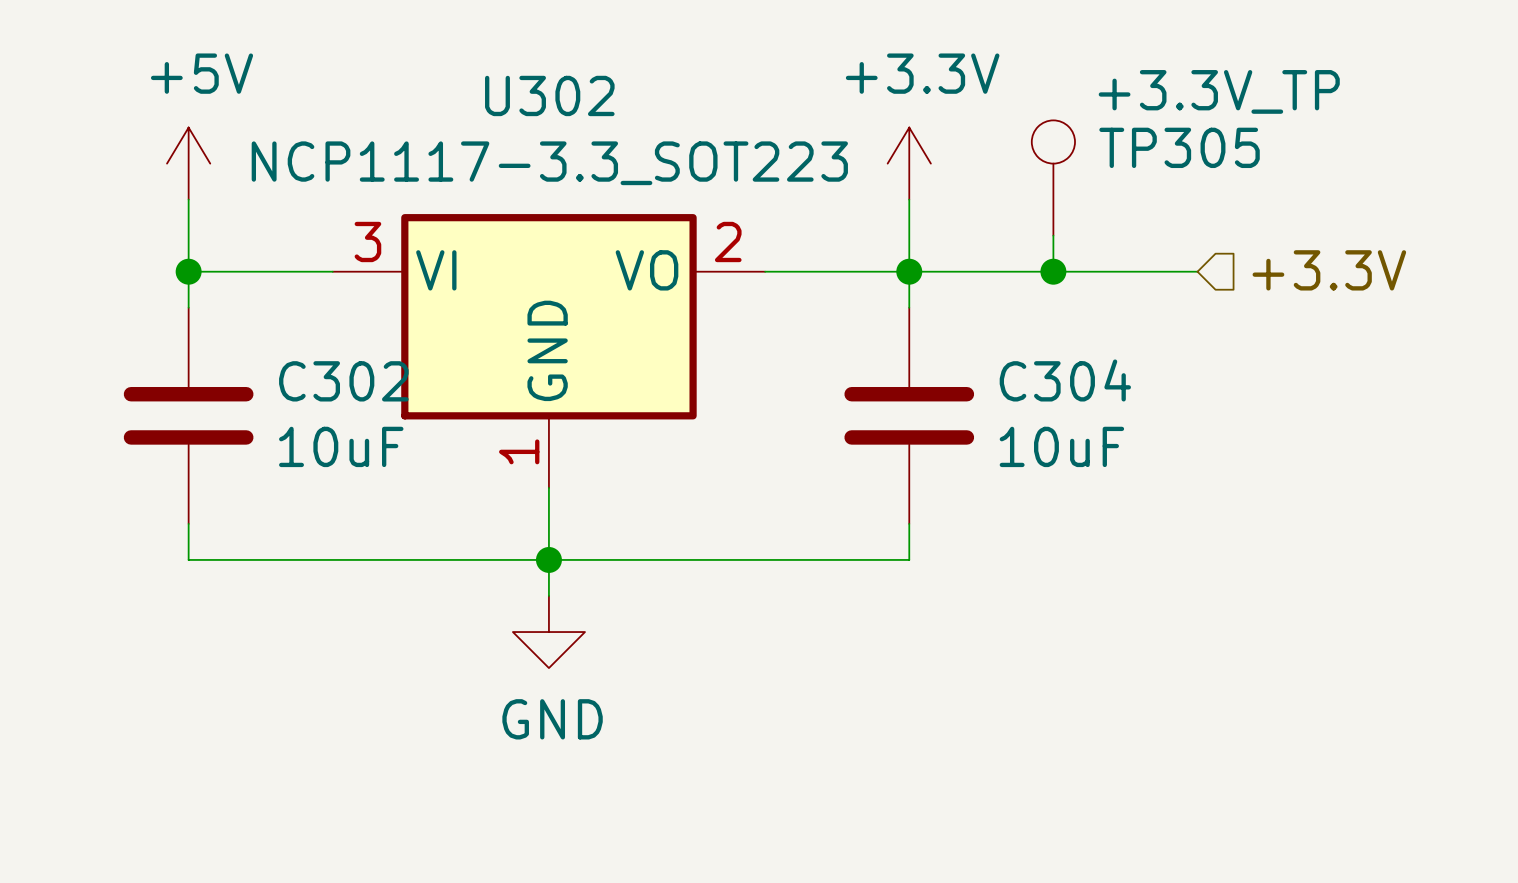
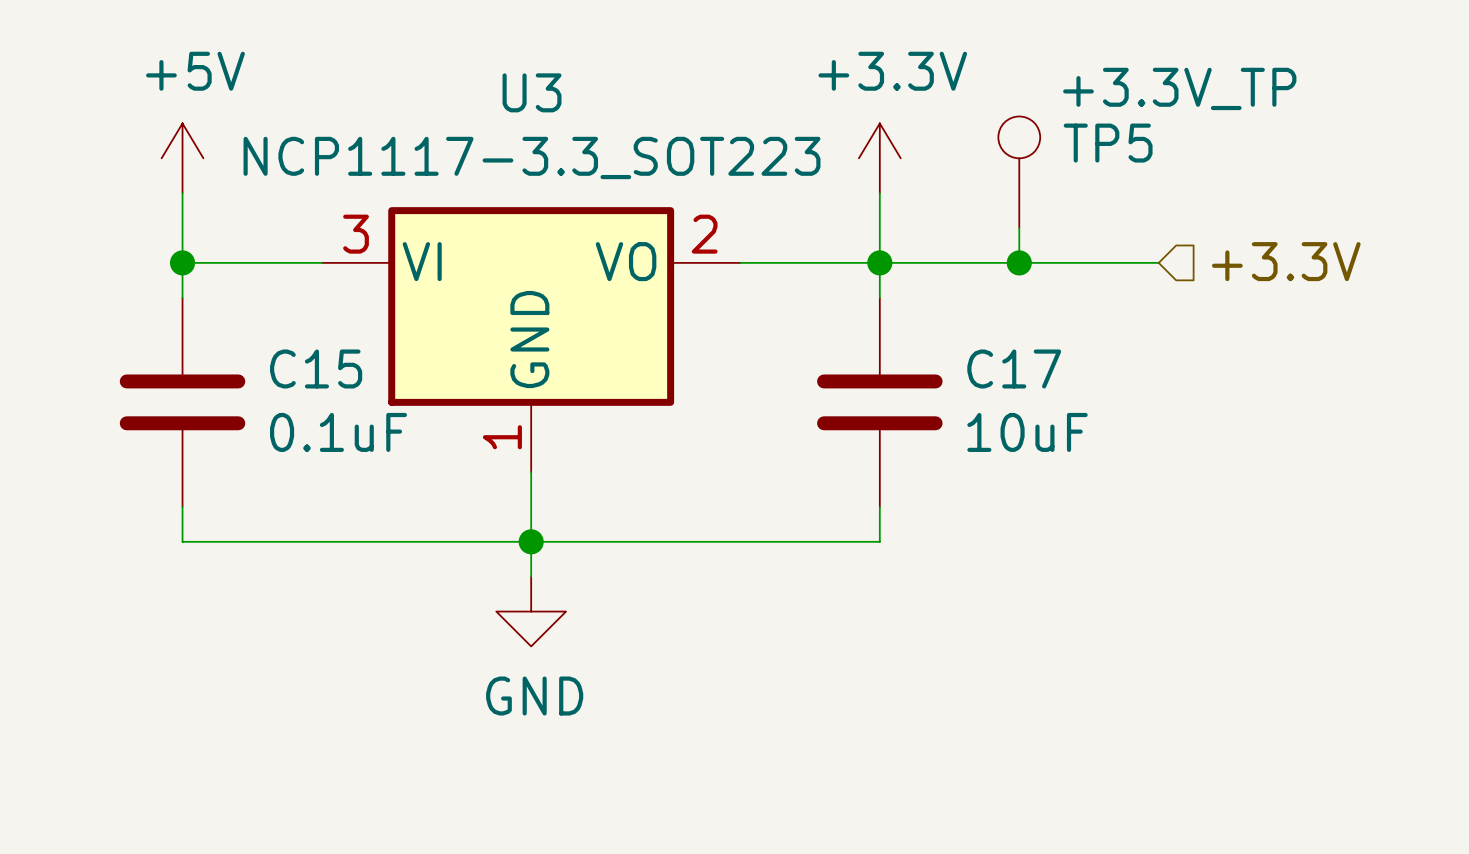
U302 name: U302 (549, 95) -> U3 (532, 92)
TP305 name: TP305 (1179, 147) -> TP5 (1108, 143)
C304 name: C304 (1065, 380) -> C17 (1014, 368)
C302 name: C302 (343, 381) -> C15 (316, 368)
C302 value: 10uF (341, 446) -> 0.1uF (338, 432)

